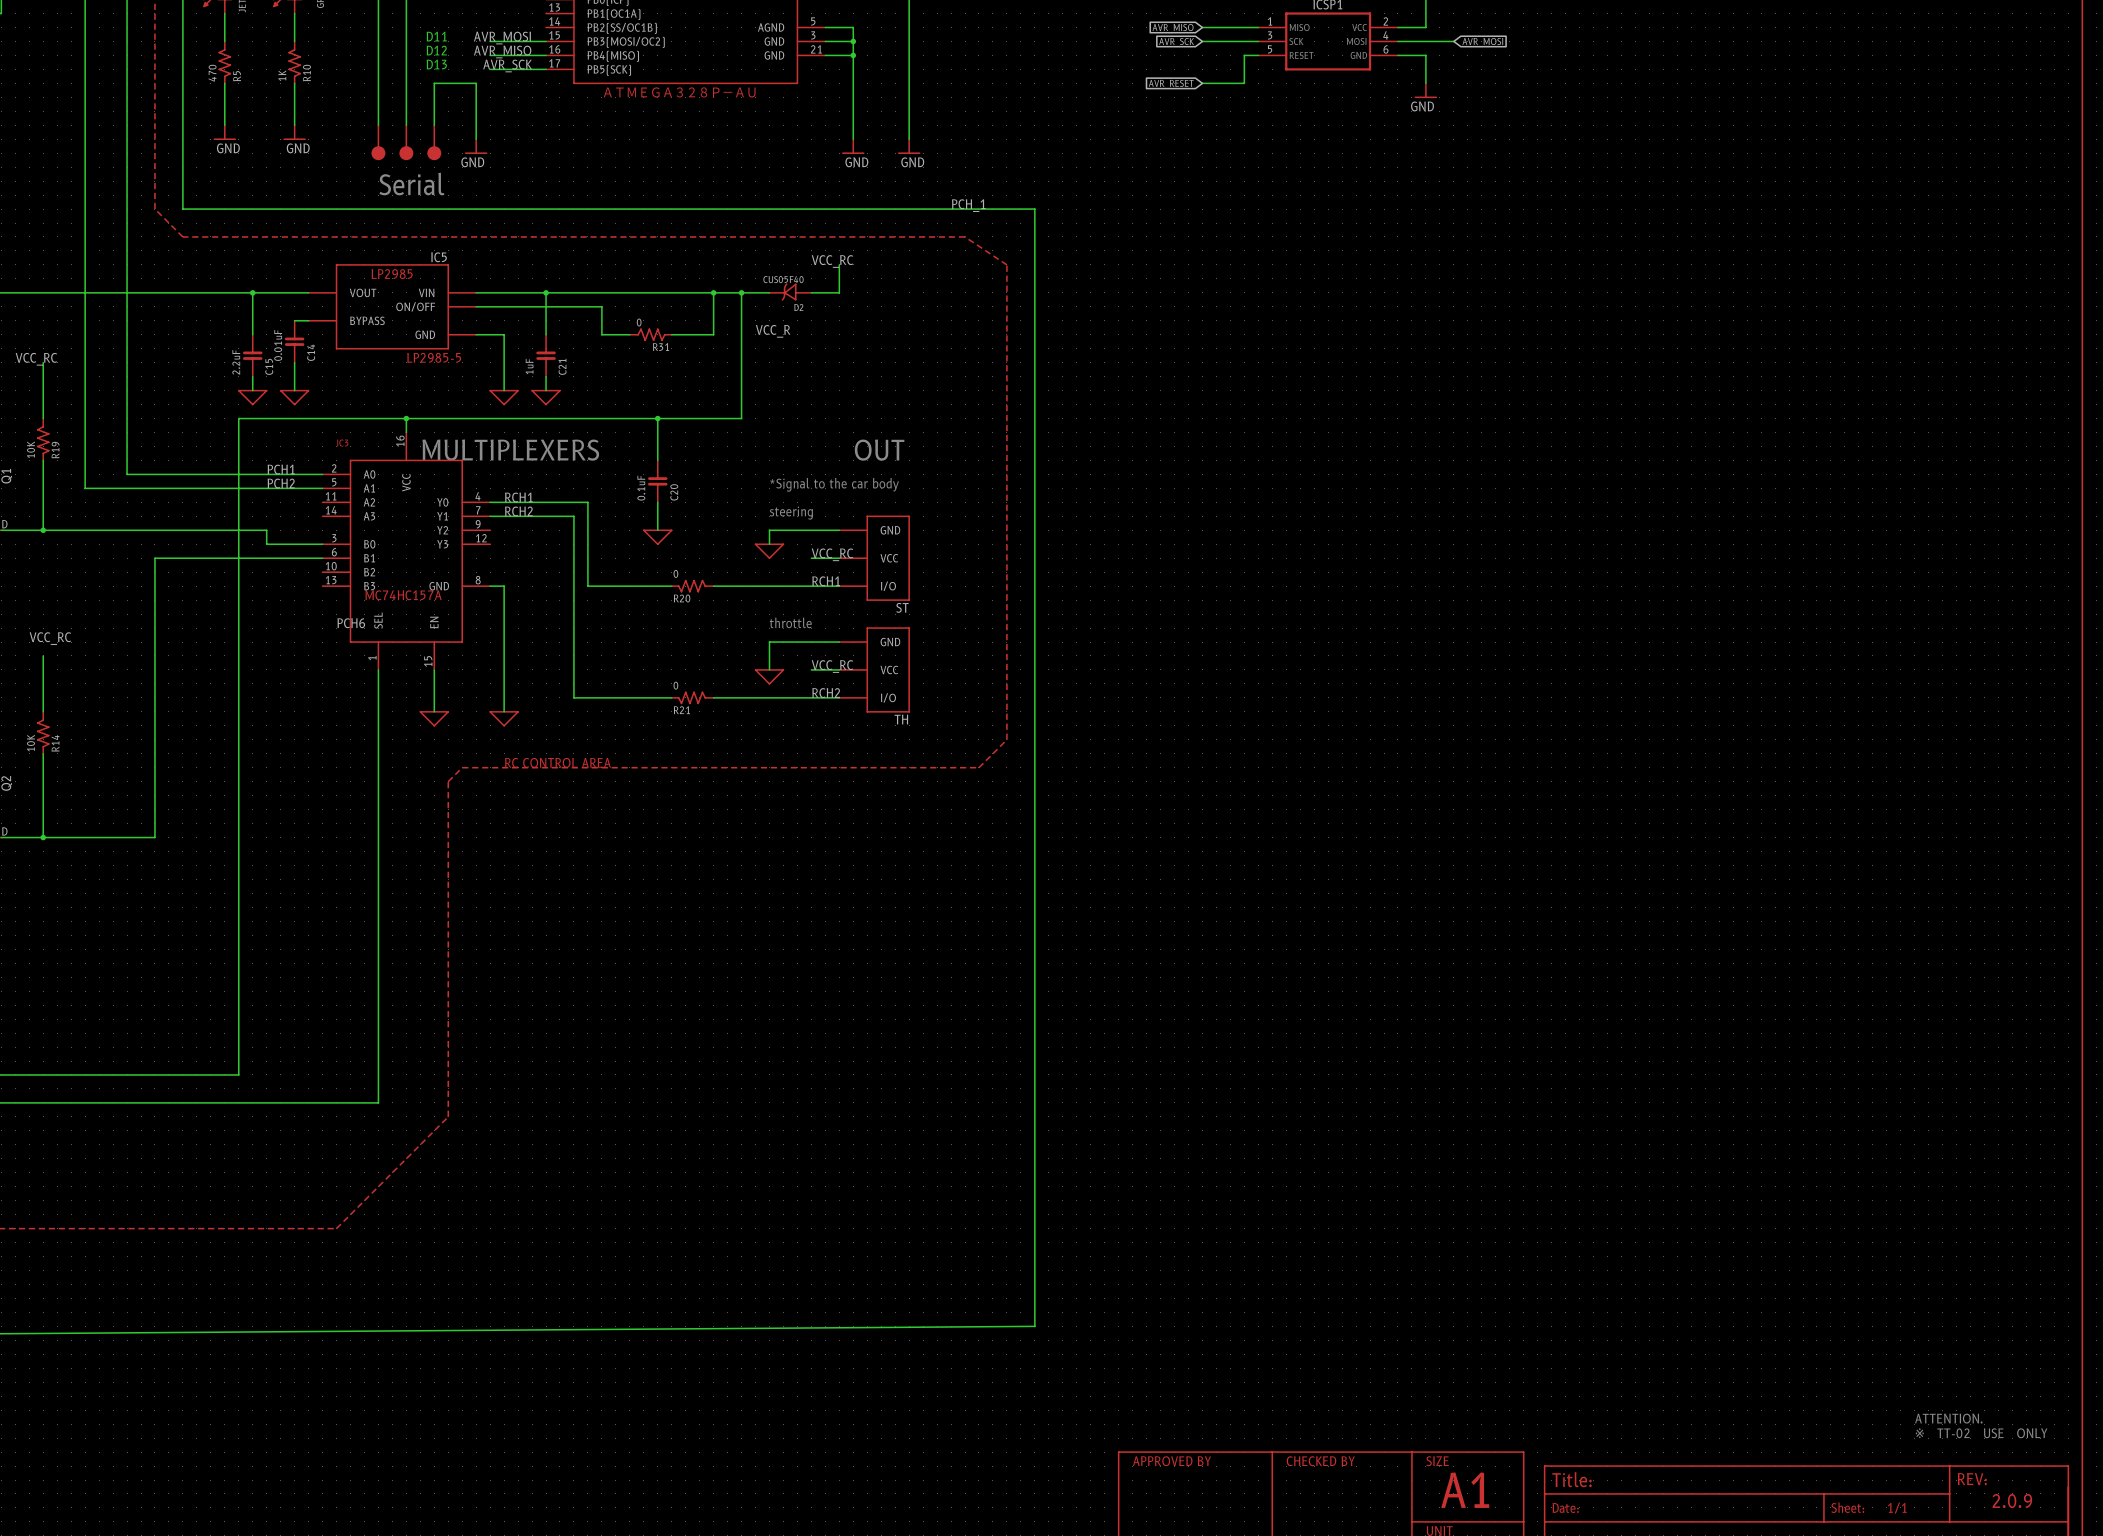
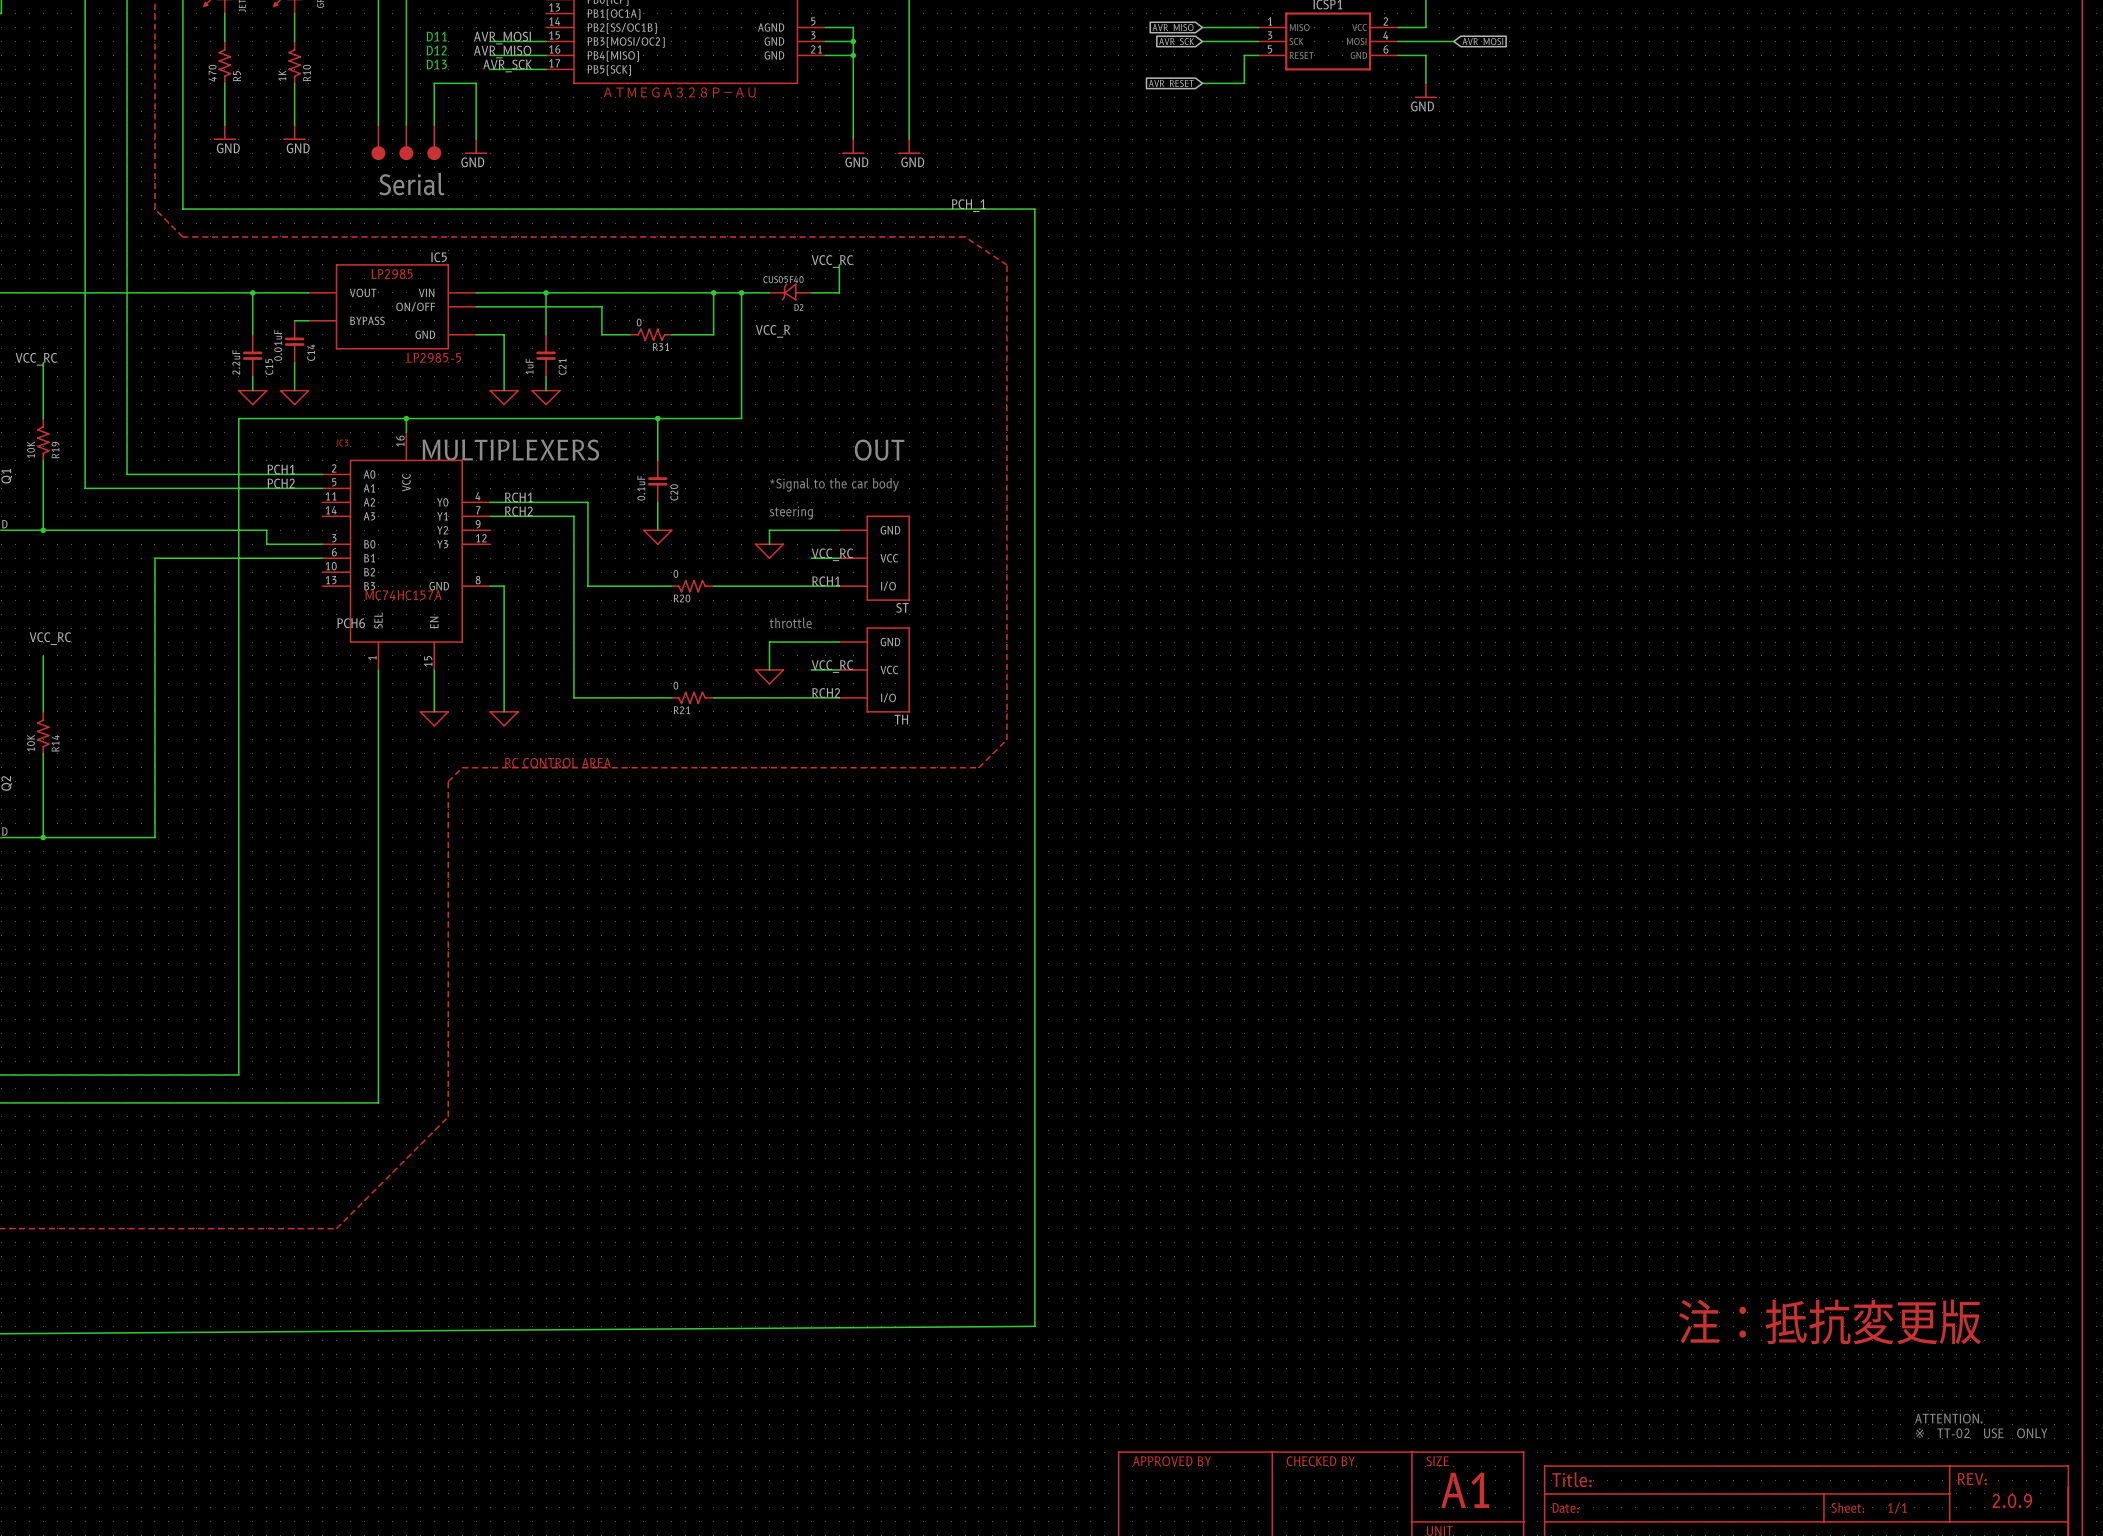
text: none -> 注：抵抗変更版 (1830, 1321)

